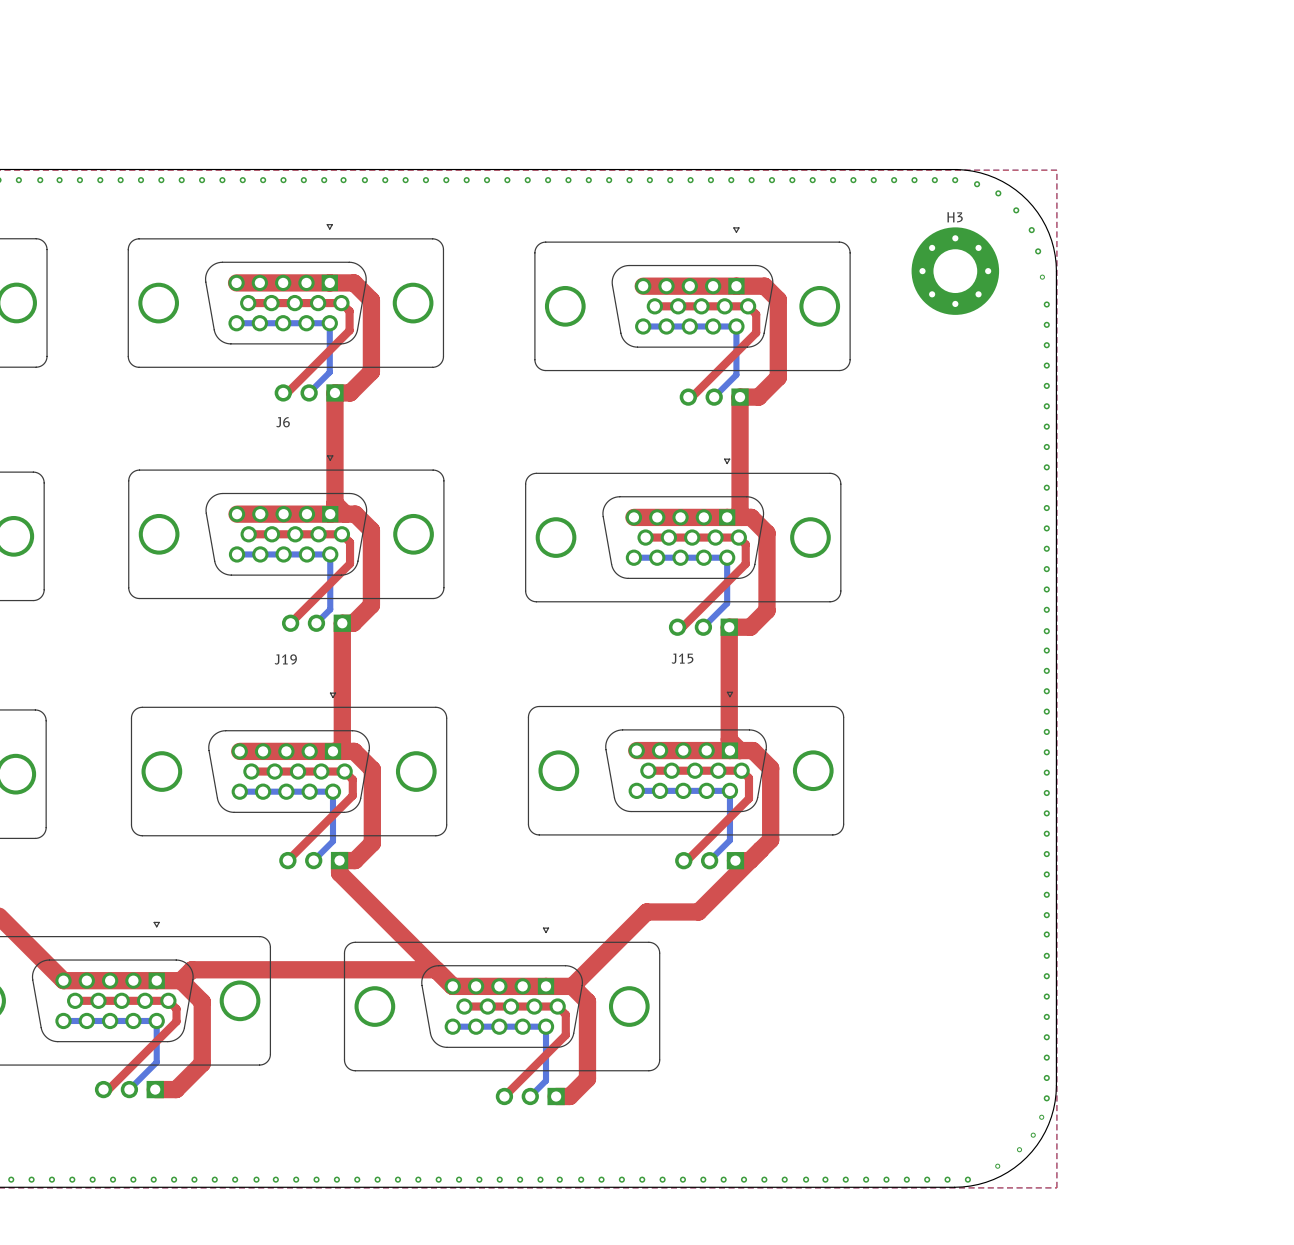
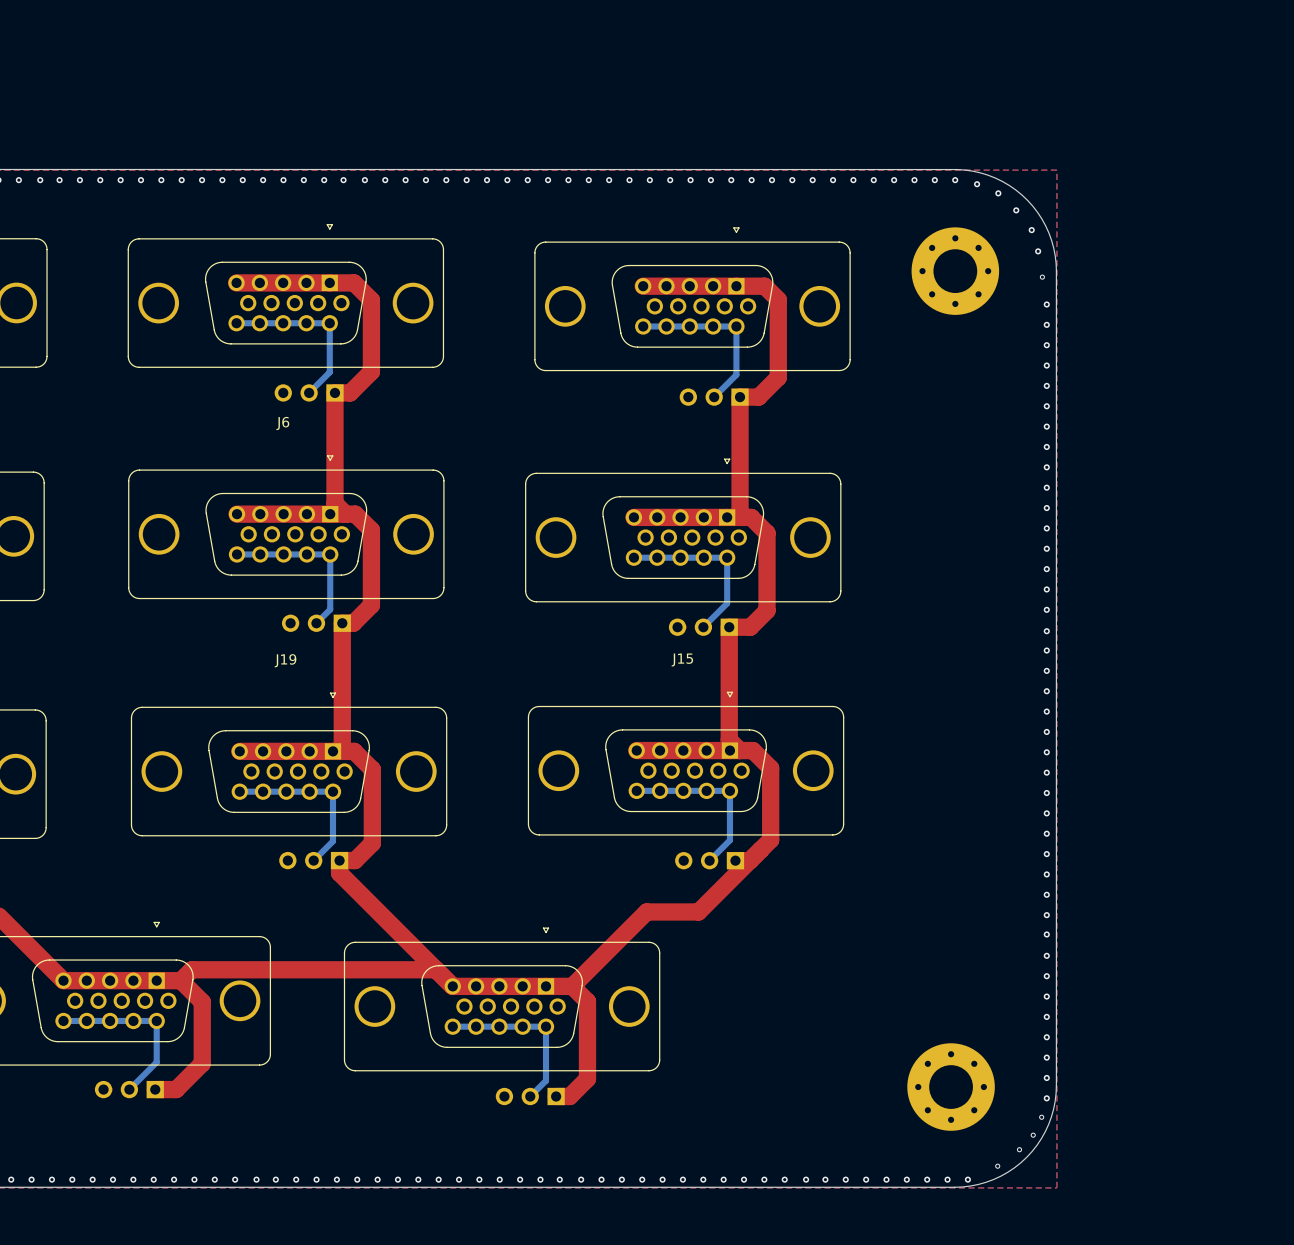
H3 name: H3 (955, 217) -> none
top track: (248, 303) (341, 303) (349, 311) (349, 330) (287, 392) -> none
top track: (654, 306) (748, 306) (756, 314) (756, 332) (691, 397) -> none
top track: (248, 534) (341, 534) (350, 542) (350, 563) (290, 623) -> none
top track: (645, 537) (738, 537) (745, 544) (745, 564) (682, 627) -> none
top track: (648, 770) (741, 770) (748, 778) (748, 798) (686, 860) -> none
top track: (251, 771) (344, 771) (352, 779) (352, 795) (287, 860) -> none
top track: (75, 1000) (168, 1000) (176, 1008) (176, 1021) (108, 1089) -> none
top track: (464, 1006) (557, 1006) (565, 1014) (565, 1035) (504, 1096) -> none
part: none -> (951, 1087)

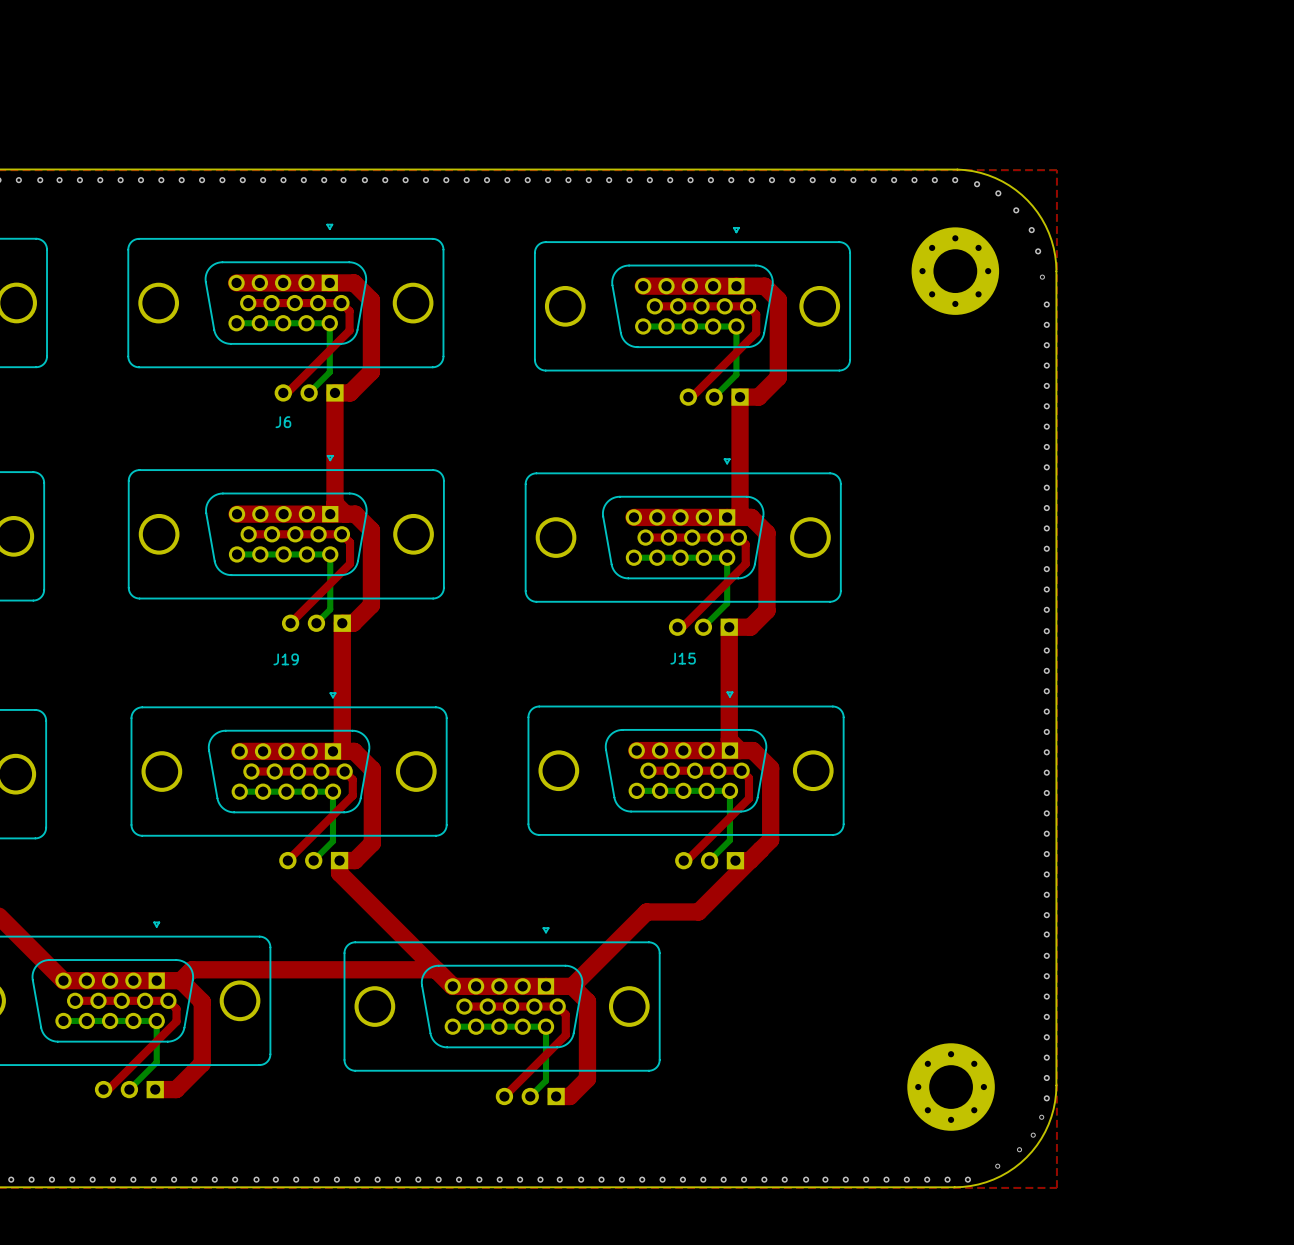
top track: none -> (248, 303) (341, 303) (349, 311) (349, 330) (287, 392)
top track: none -> (654, 306) (748, 306) (756, 314) (756, 332) (691, 397)
top track: none -> (248, 534) (341, 534) (350, 542) (350, 563) (290, 623)
top track: none -> (645, 537) (738, 537) (745, 544) (745, 564) (682, 627)
top track: none -> (648, 770) (741, 770) (748, 778) (748, 798) (686, 860)
top track: none -> (251, 771) (344, 771) (352, 779) (352, 795) (287, 860)
top track: none -> (75, 1000) (168, 1000) (176, 1008) (176, 1021) (108, 1089)
top track: none -> (464, 1006) (557, 1006) (565, 1014) (565, 1035) (504, 1096)

